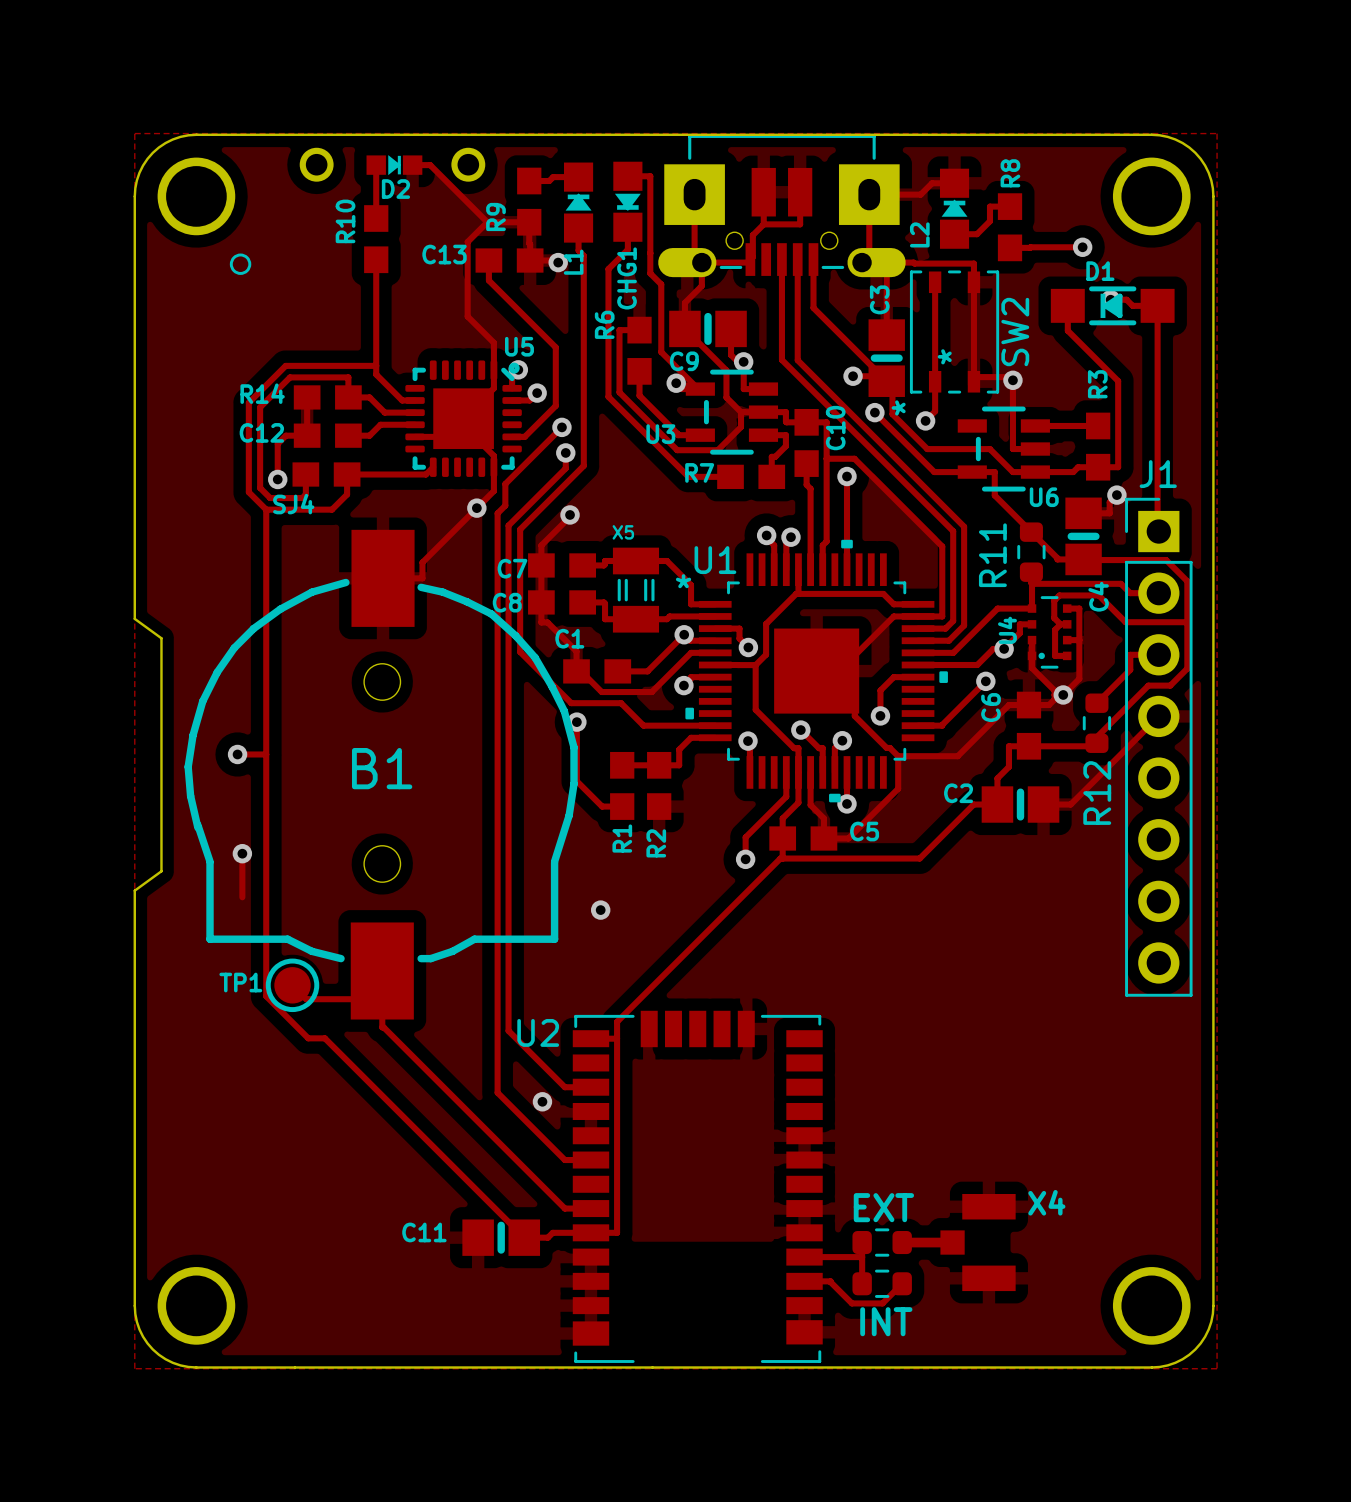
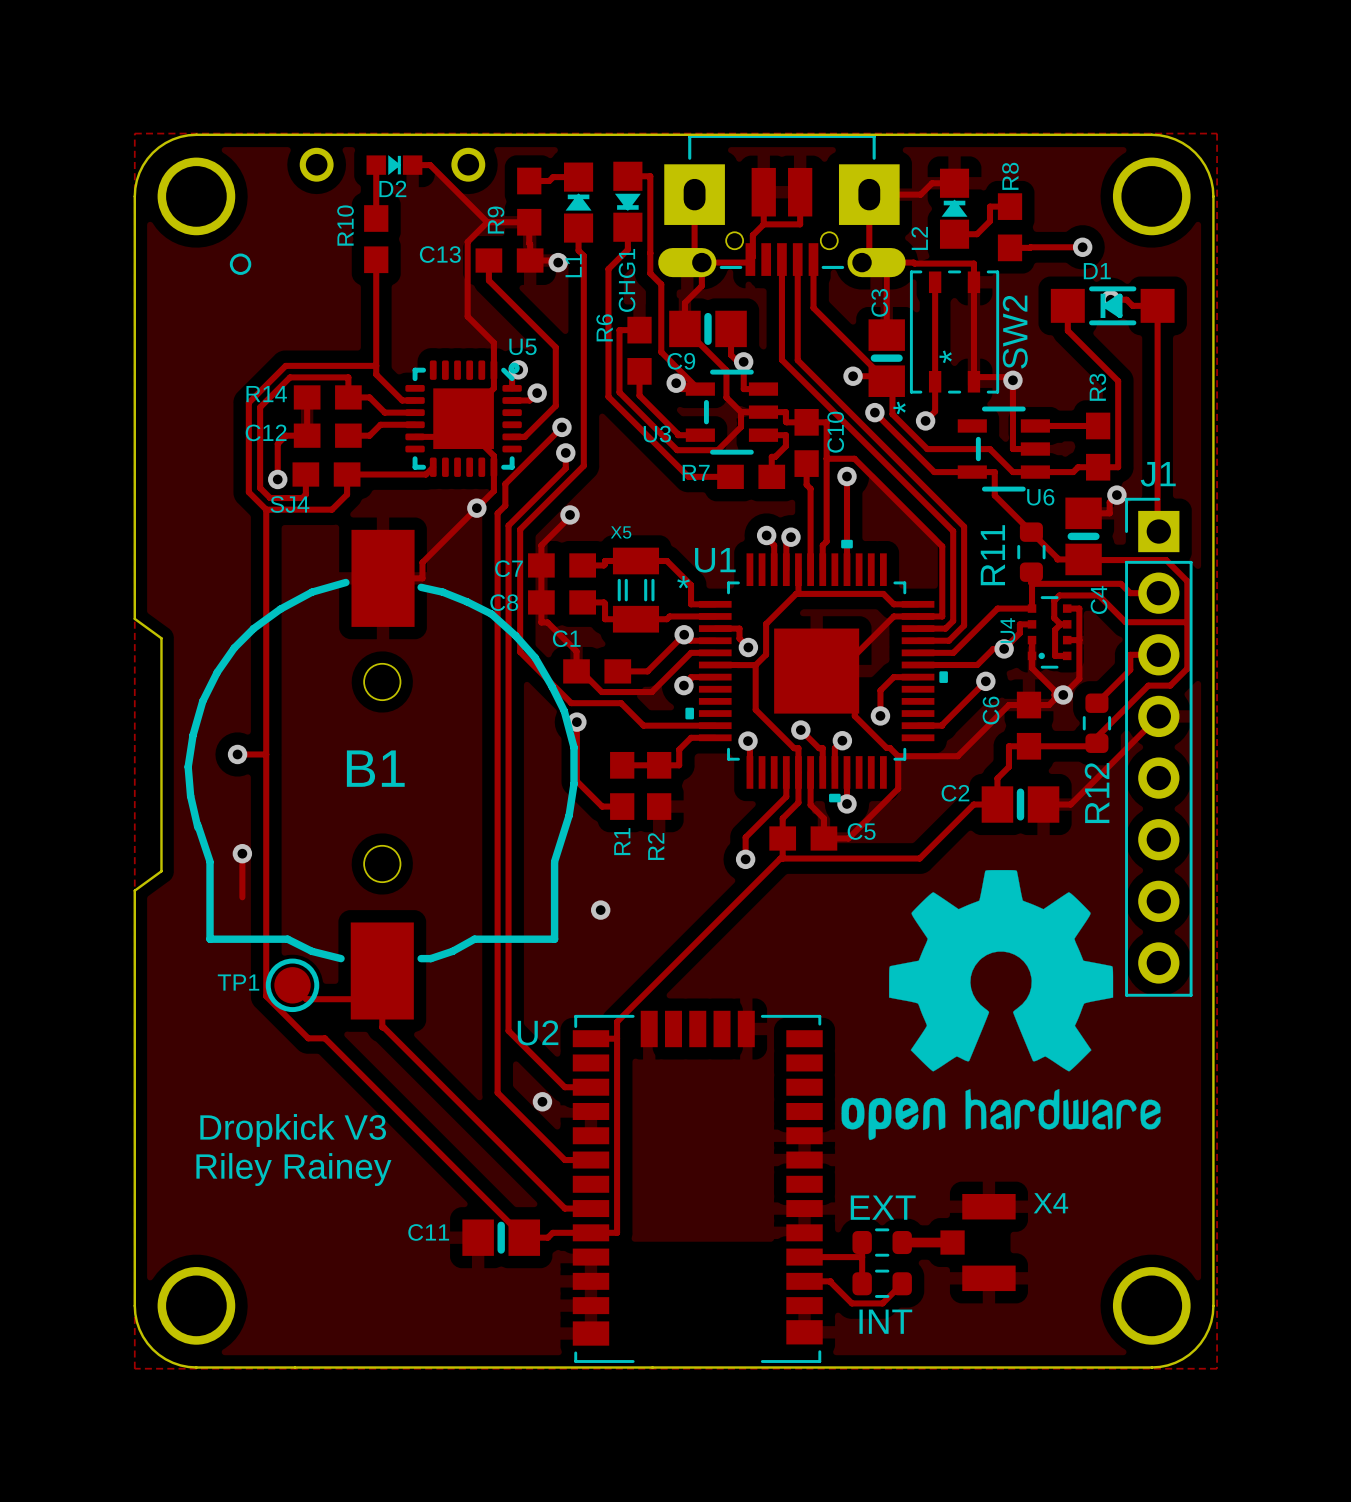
drawing: none -> [841, 869, 1161, 1141]
text: none -> Dropkick V3 (293, 1130)
text: none -> Riley Rainey (293, 1169)

